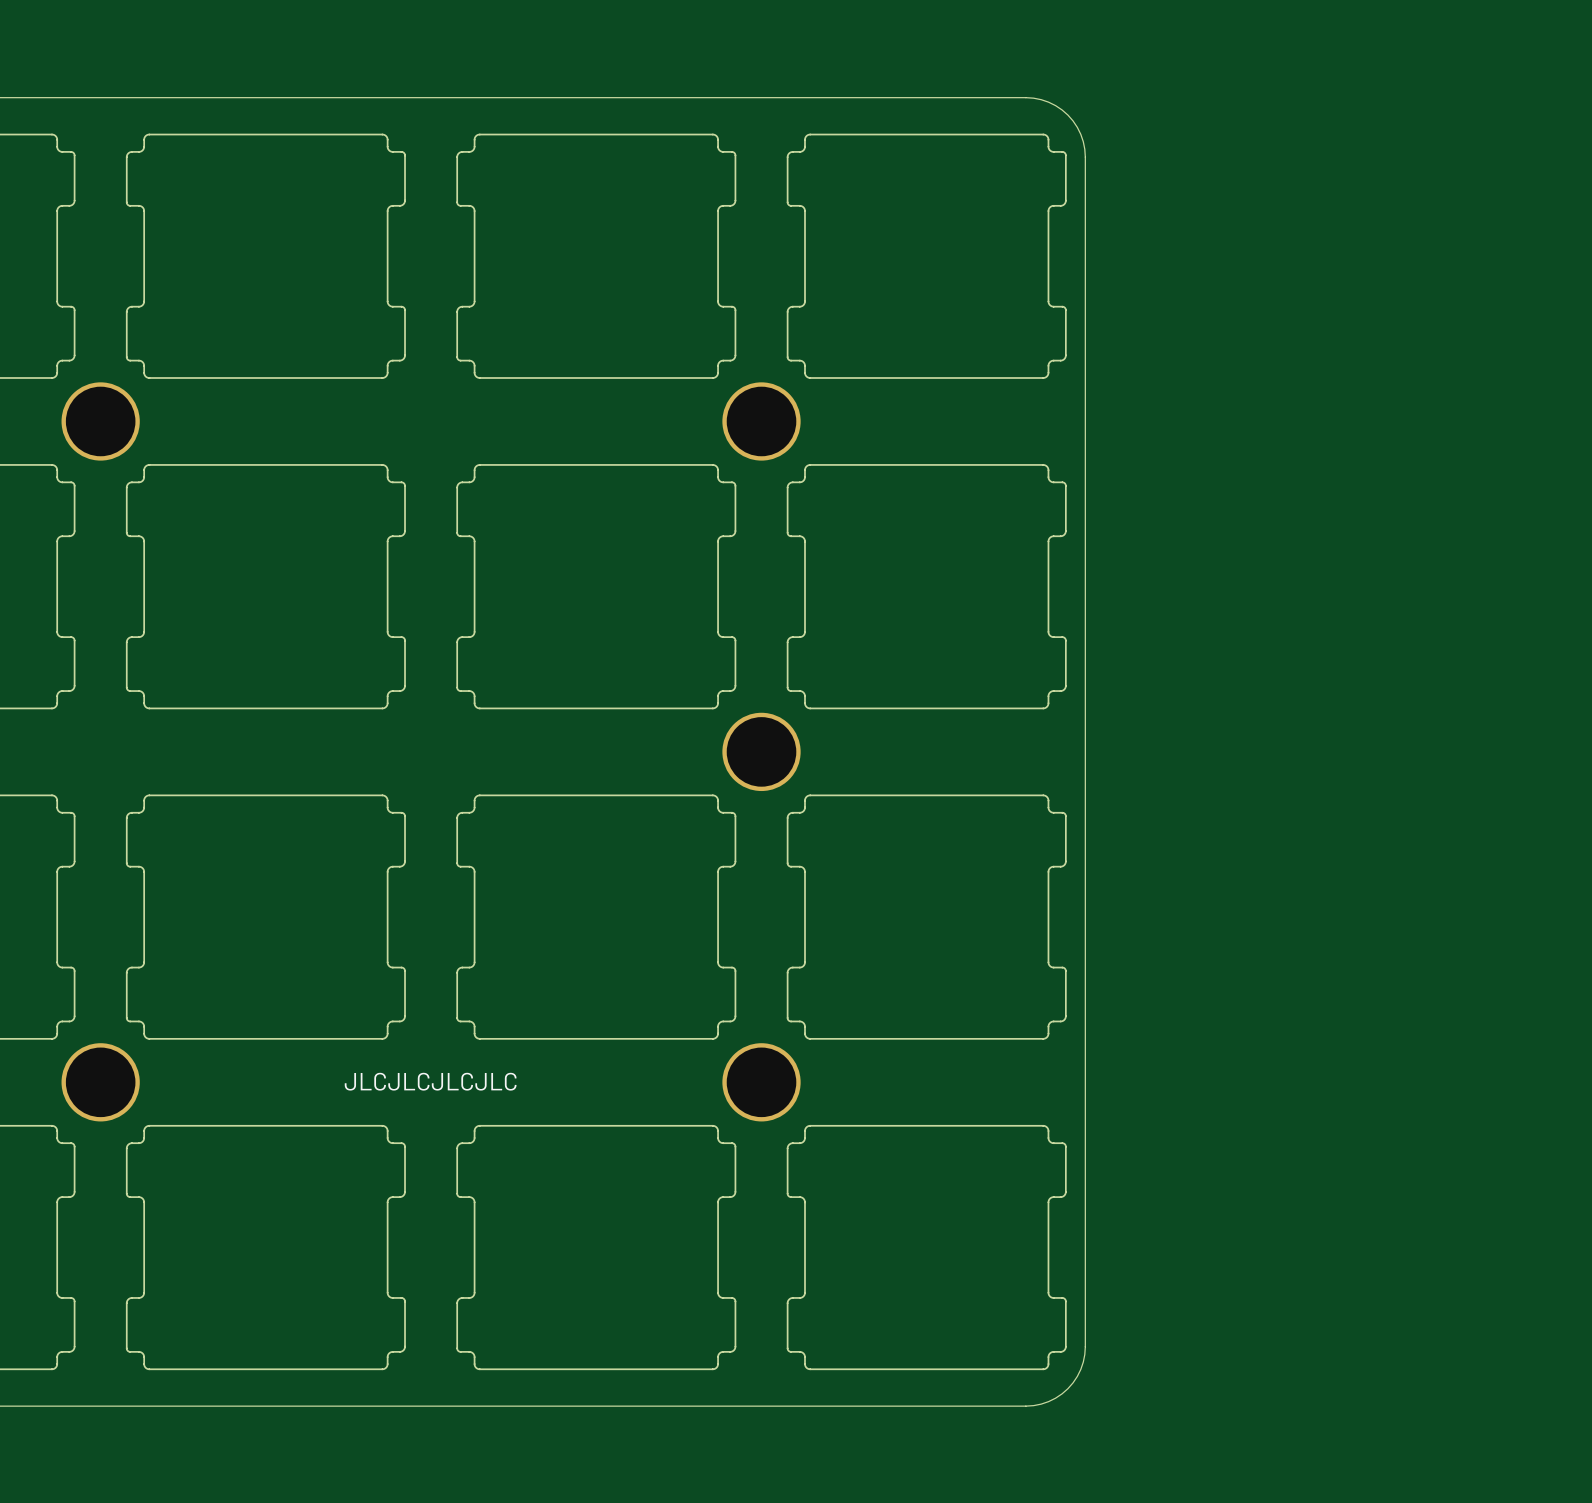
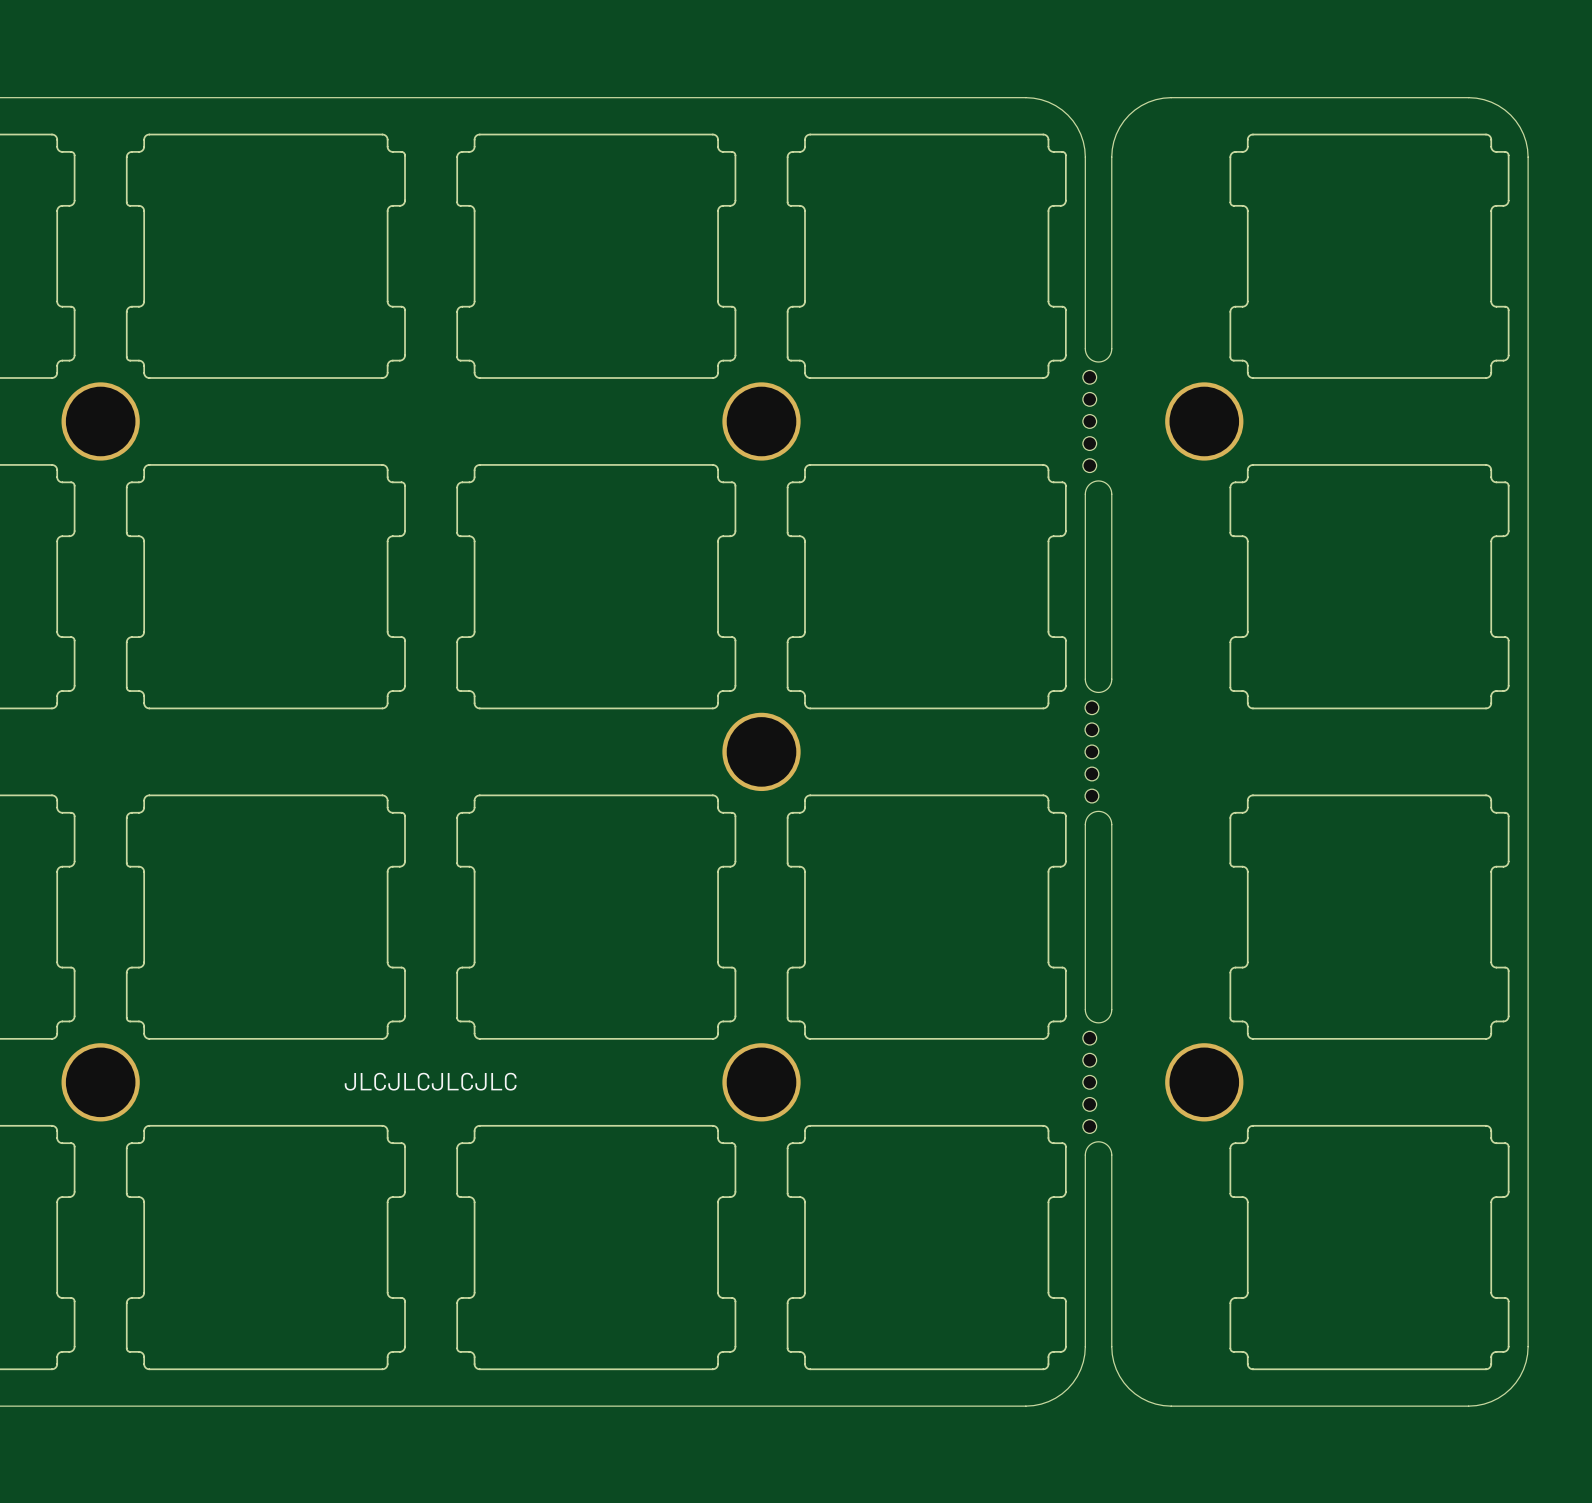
drawing: none -> [1229, 133, 1510, 379]
board edge: (1085, 348) (1085, 494) -> (1085, 679) (1089, 688) (1098, 692) (1107, 688) (1111, 679) (1111, 492) (1106, 483) (1096, 481) (1089, 484) (1085, 494)
part: none -> (1089, 421)
part: none -> (1204, 421)
drawing: none -> [1229, 464, 1510, 710]
board edge: (1085, 679) (1085, 824) -> (1085, 1009) (1089, 1018) (1098, 1022) (1107, 1018) (1111, 1009) (1111, 822) (1106, 814) (1096, 811) (1089, 815) (1085, 824)
part: none -> (1091, 751)
drawing: none -> [1229, 794, 1510, 1040]
board edge: (1085, 1009) (1085, 1155) -> (1085, 348) (1089, 358) (1096, 361) (1105, 360) (1111, 352) (1112, 149) (1116, 134) (1124, 120) (1141, 105) (1155, 99) (1171, 97) (1468, 97) (1484, 99) (1498, 105) (1510, 115) (1520, 127) (1526, 141) (1528, 157) (1528, 1346) (1526, 1362) (1520, 1376) (1510, 1388) (1498, 1398) (1484, 1404) (1468, 1406) (1171, 1406) (1155, 1404) (1141, 1398) (1124, 1382) (1116, 1369) (1112, 1354) (1111, 1151) (1105, 1143) (1096, 1141) (1089, 1145) (1085, 1155)
part: none -> (1089, 1082)
part: none -> (1204, 1082)
drawing: none -> [1229, 1124, 1510, 1371]

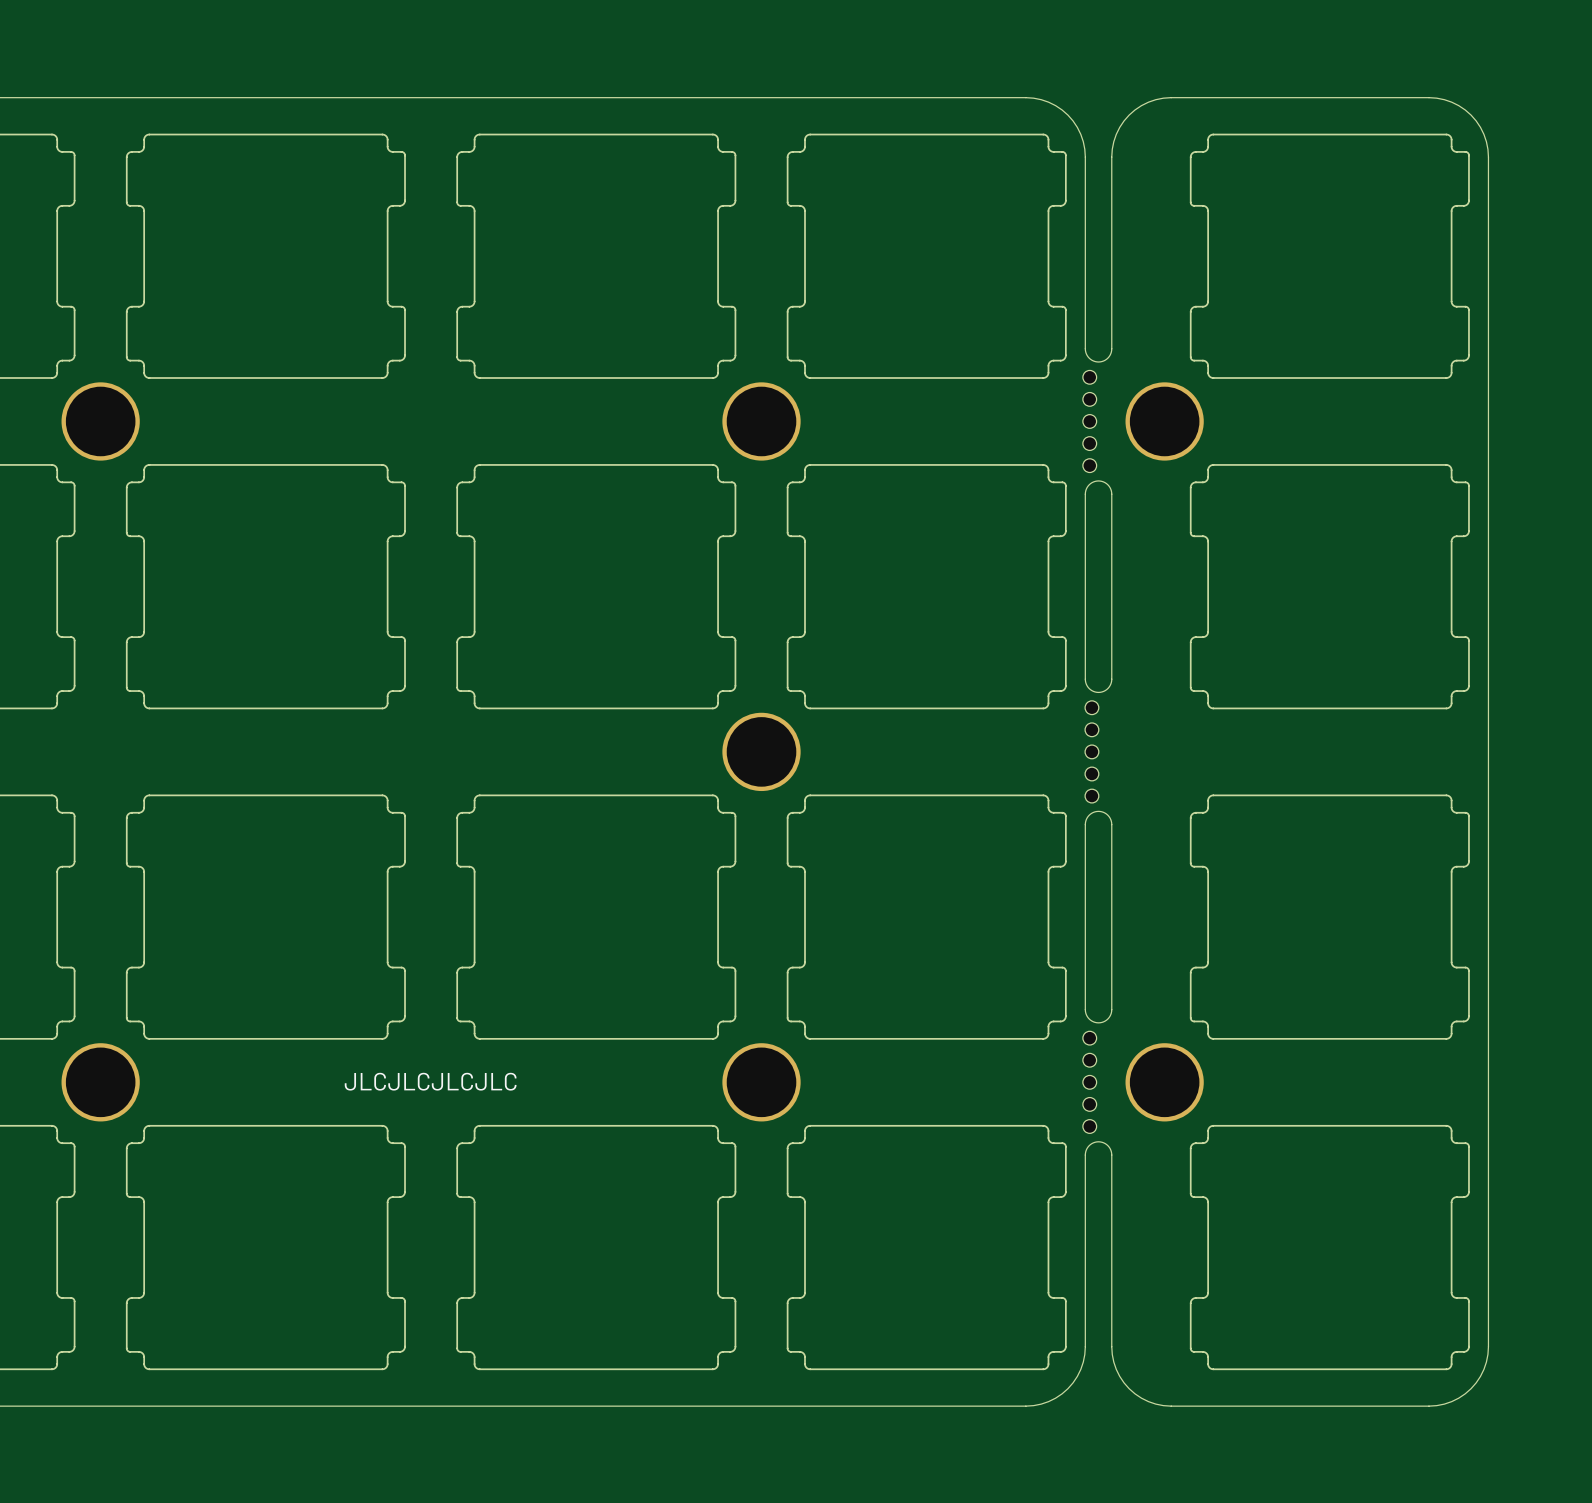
board edge: (1428, 97) (1476, 98) (1498, 105) (1515, 120) (1523, 134) (1527, 149) (1528, 1346) (1526, 1362) (1520, 1376) (1510, 1388) (1498, 1398) (1476, 1405) (1428, 1406) -> (1428, 97) (1451, 102) (1471, 115) (1483, 134) (1488, 157) (1488, 1346) (1483, 1369) (1471, 1388) (1451, 1401) (1428, 1406)
drawing position: (1369, 256) -> (1329, 256)
part position: (1204, 421) -> (1164, 421)
drawing position: (1369, 586) -> (1329, 586)
drawing position: (1369, 917) -> (1329, 917)
part position: (1204, 1082) -> (1164, 1082)
drawing position: (1369, 1247) -> (1329, 1247)

